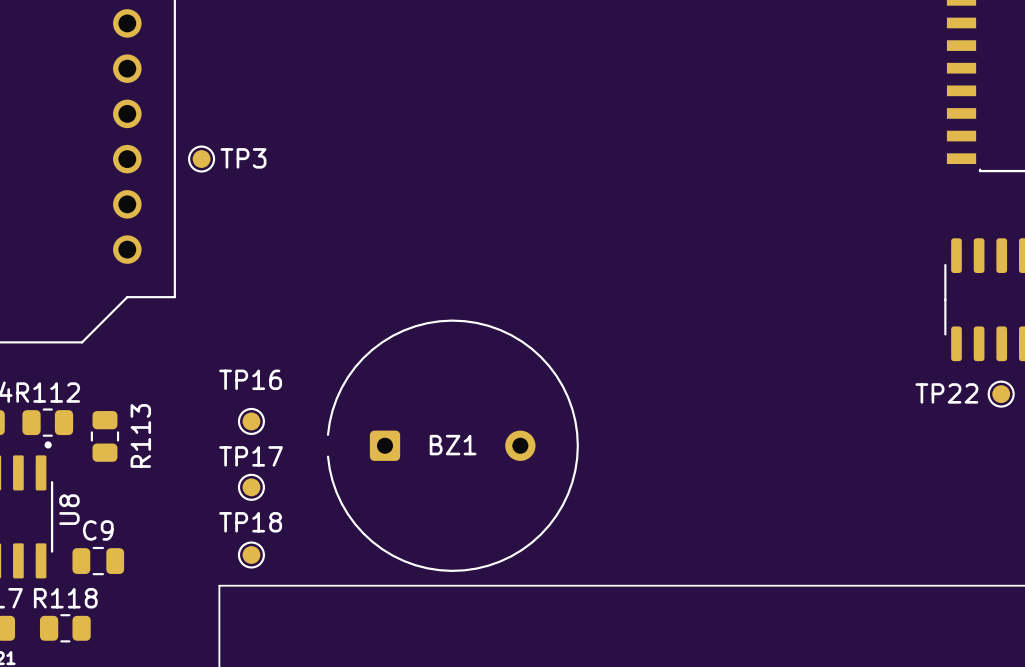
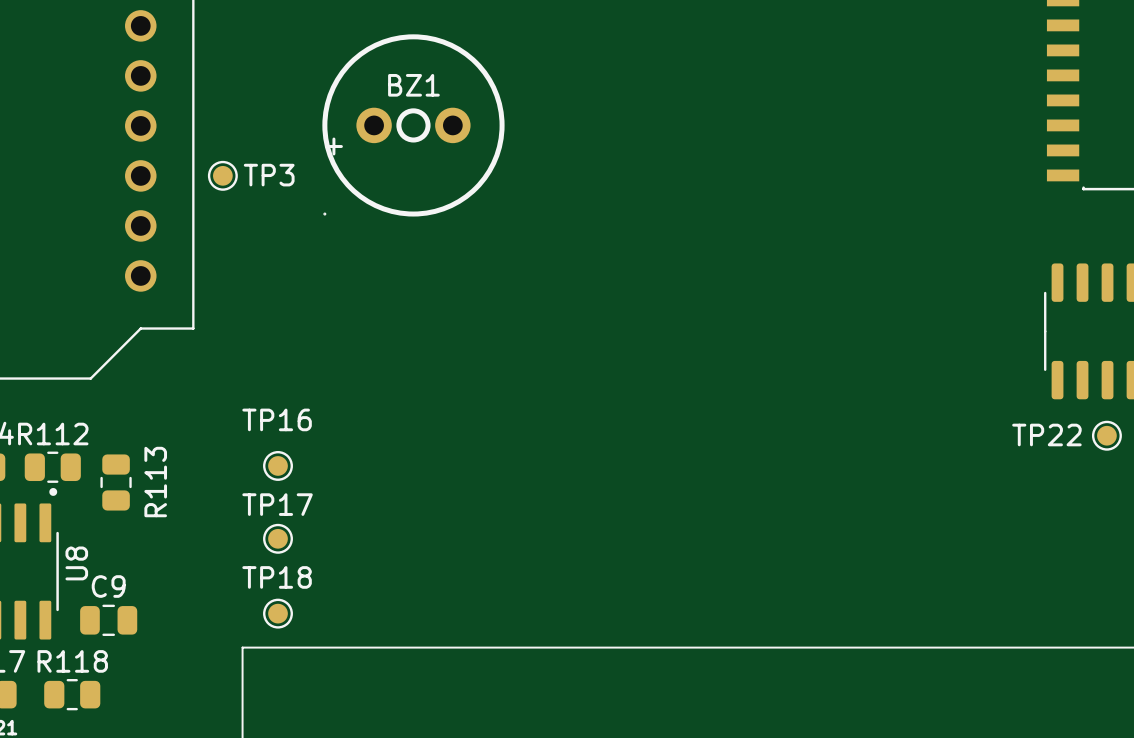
BZ1 footprint: [326, 319, 579, 572] -> [322, 34, 505, 217]
BZ1 name position: BZ1 (453, 445) -> BZ1 (413, 85)

